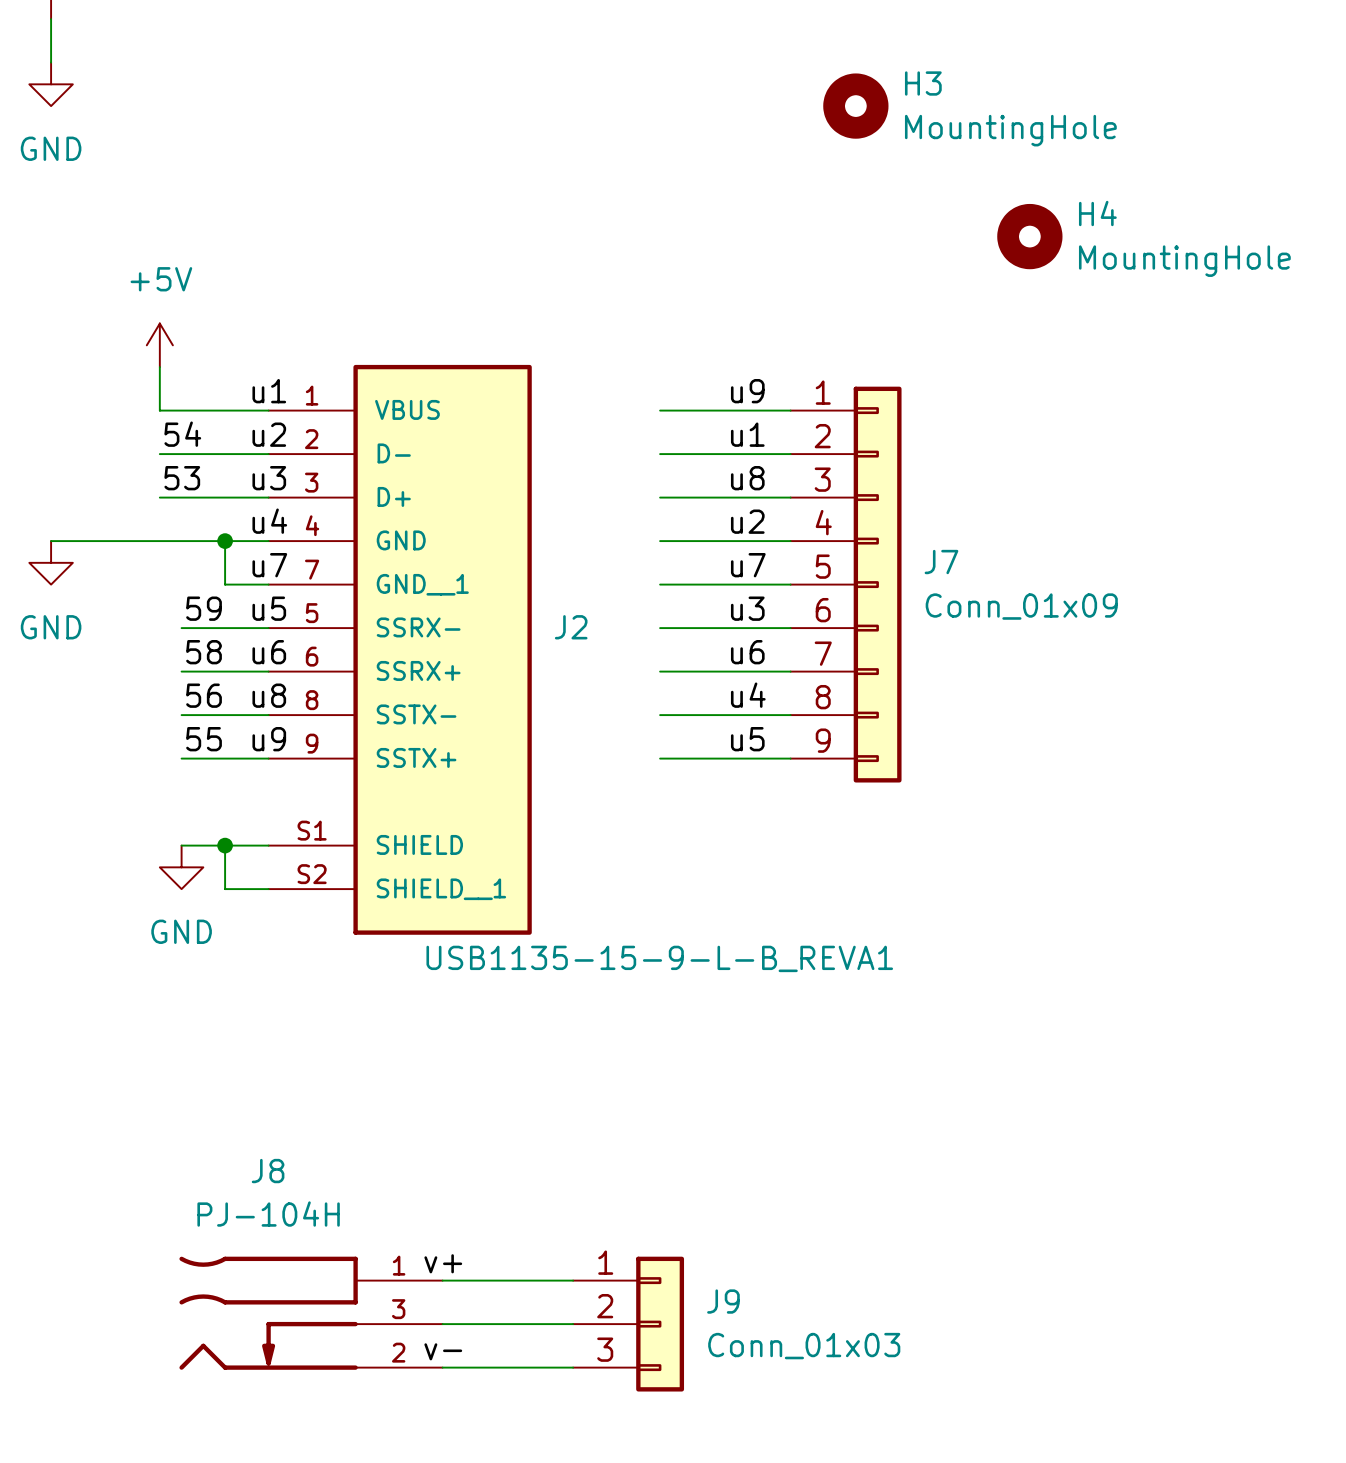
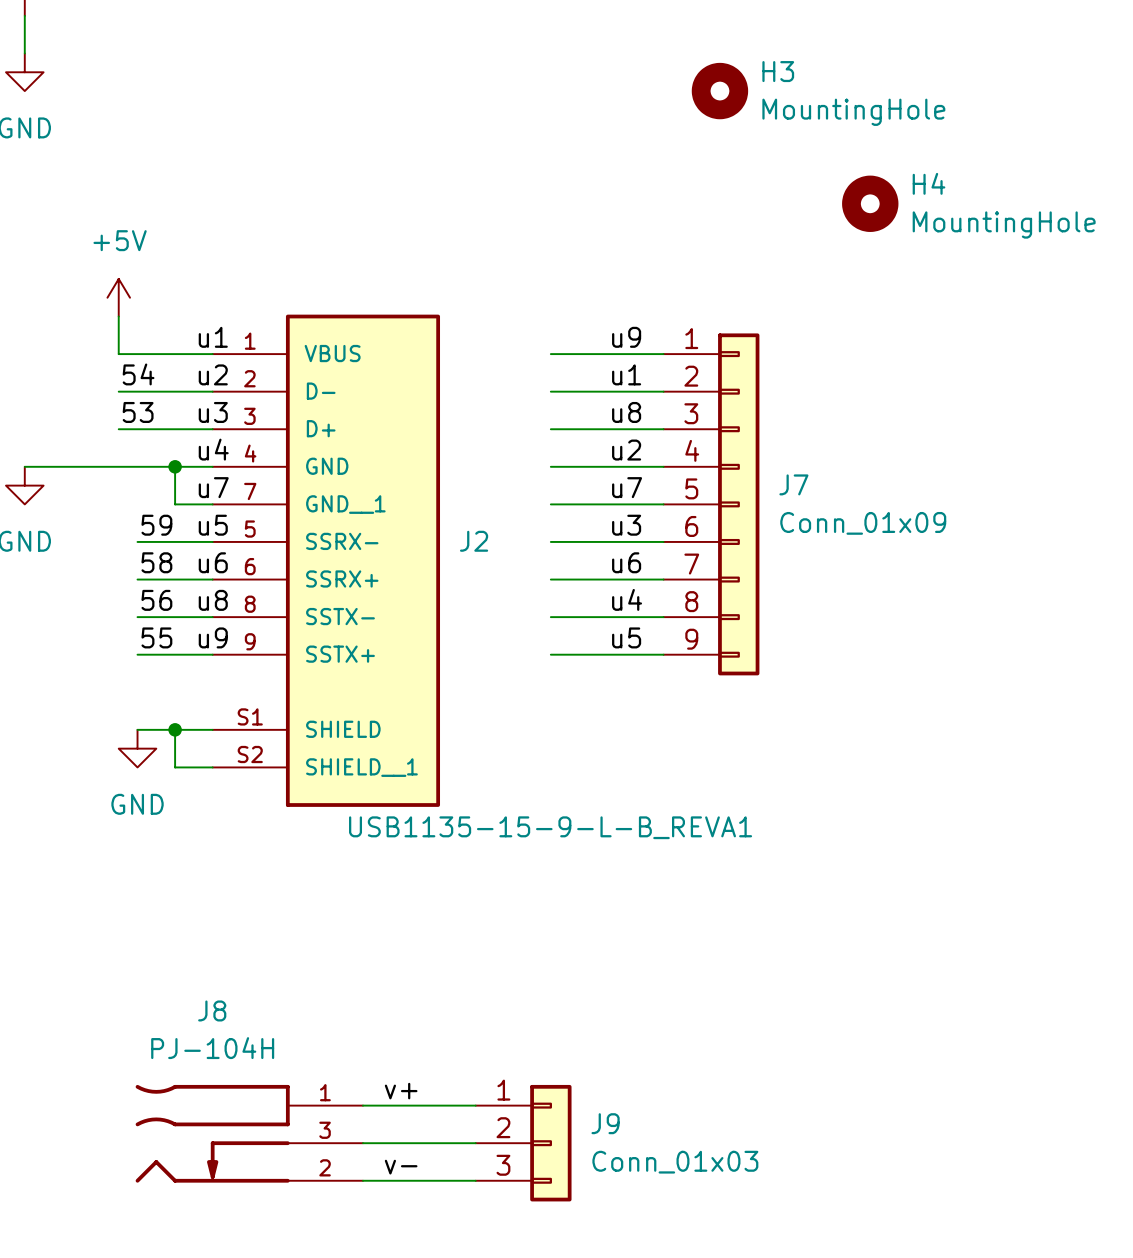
label position: v+ (443, 1263) -> v+ (401, 1091)
label position: v- (443, 1351) -> v- (401, 1167)

